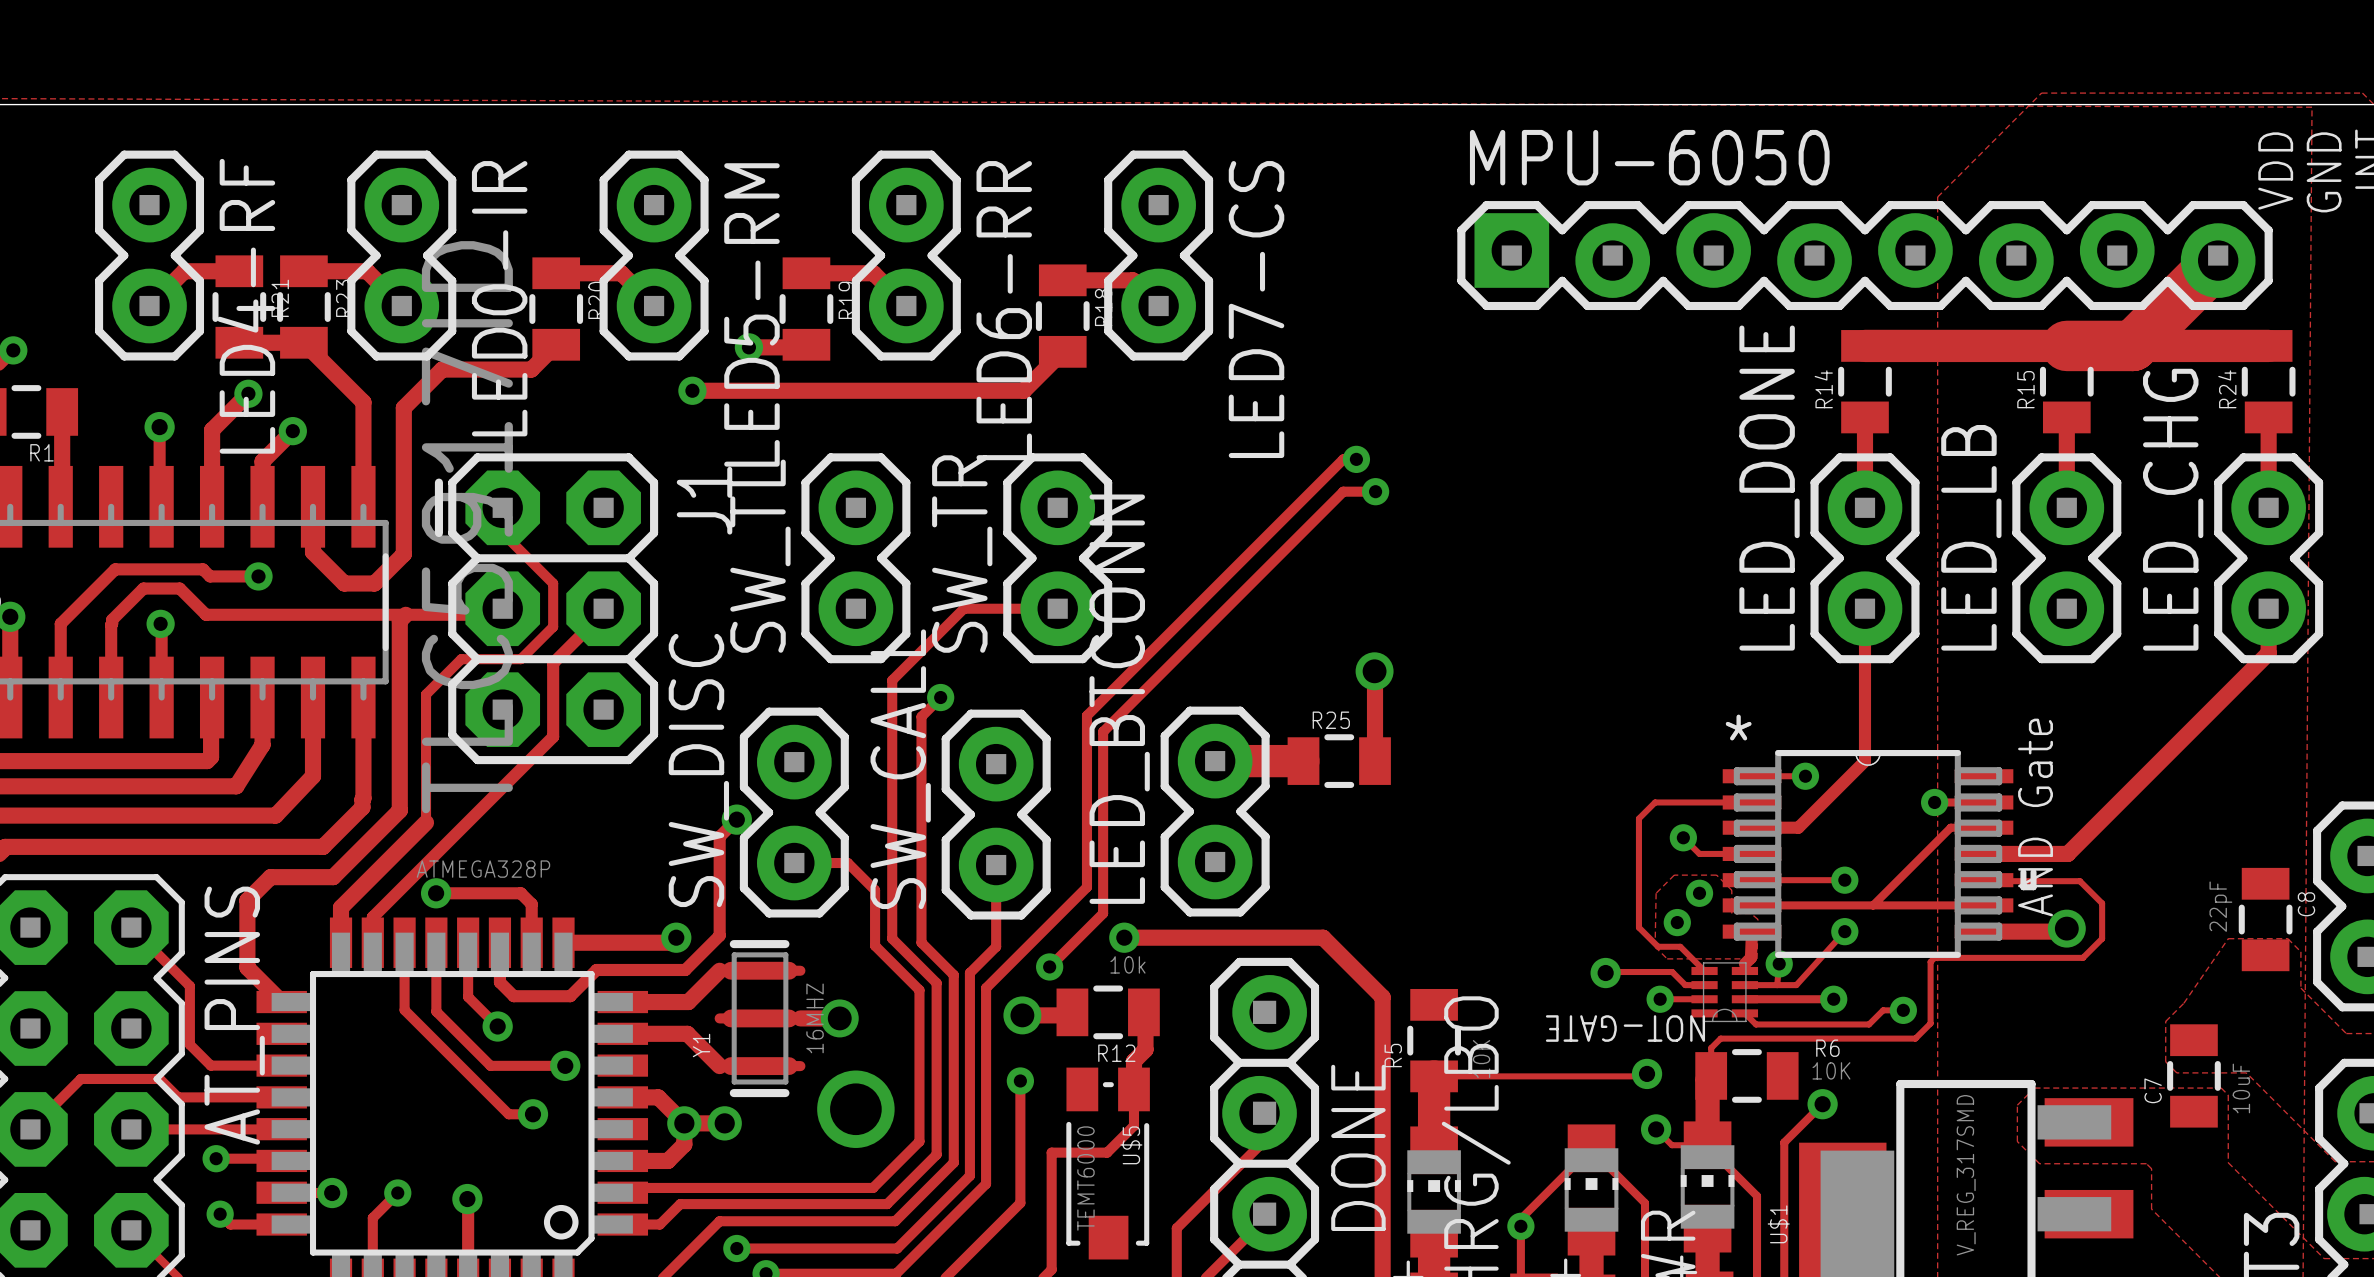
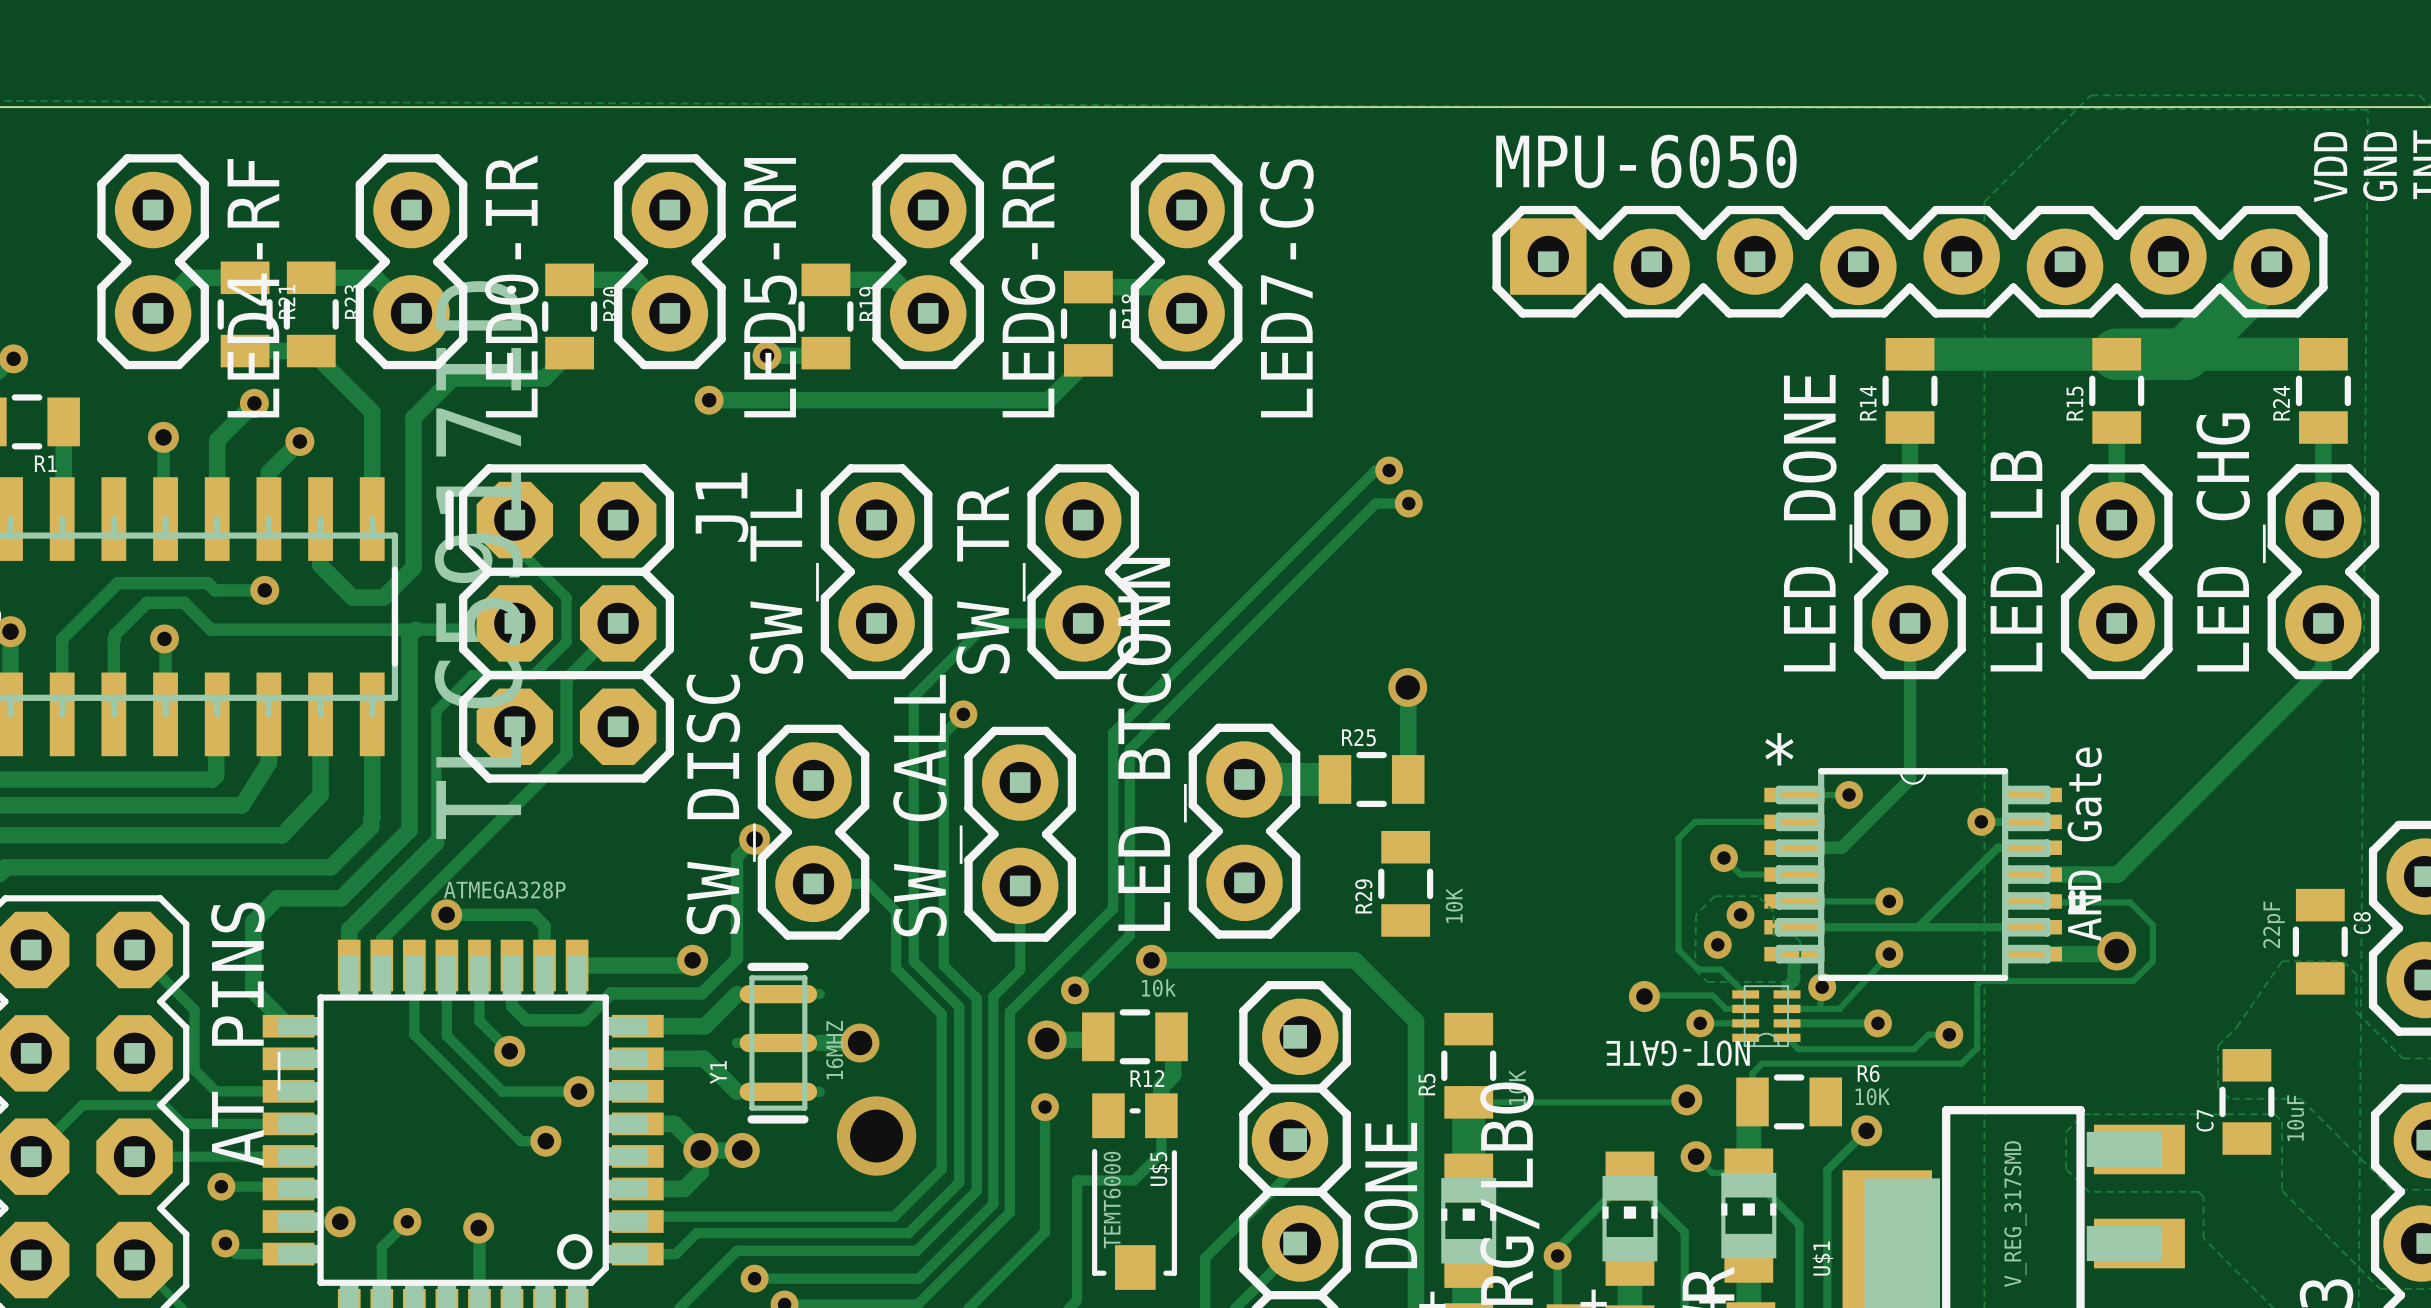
R29: none -> 10K (1405, 883)

